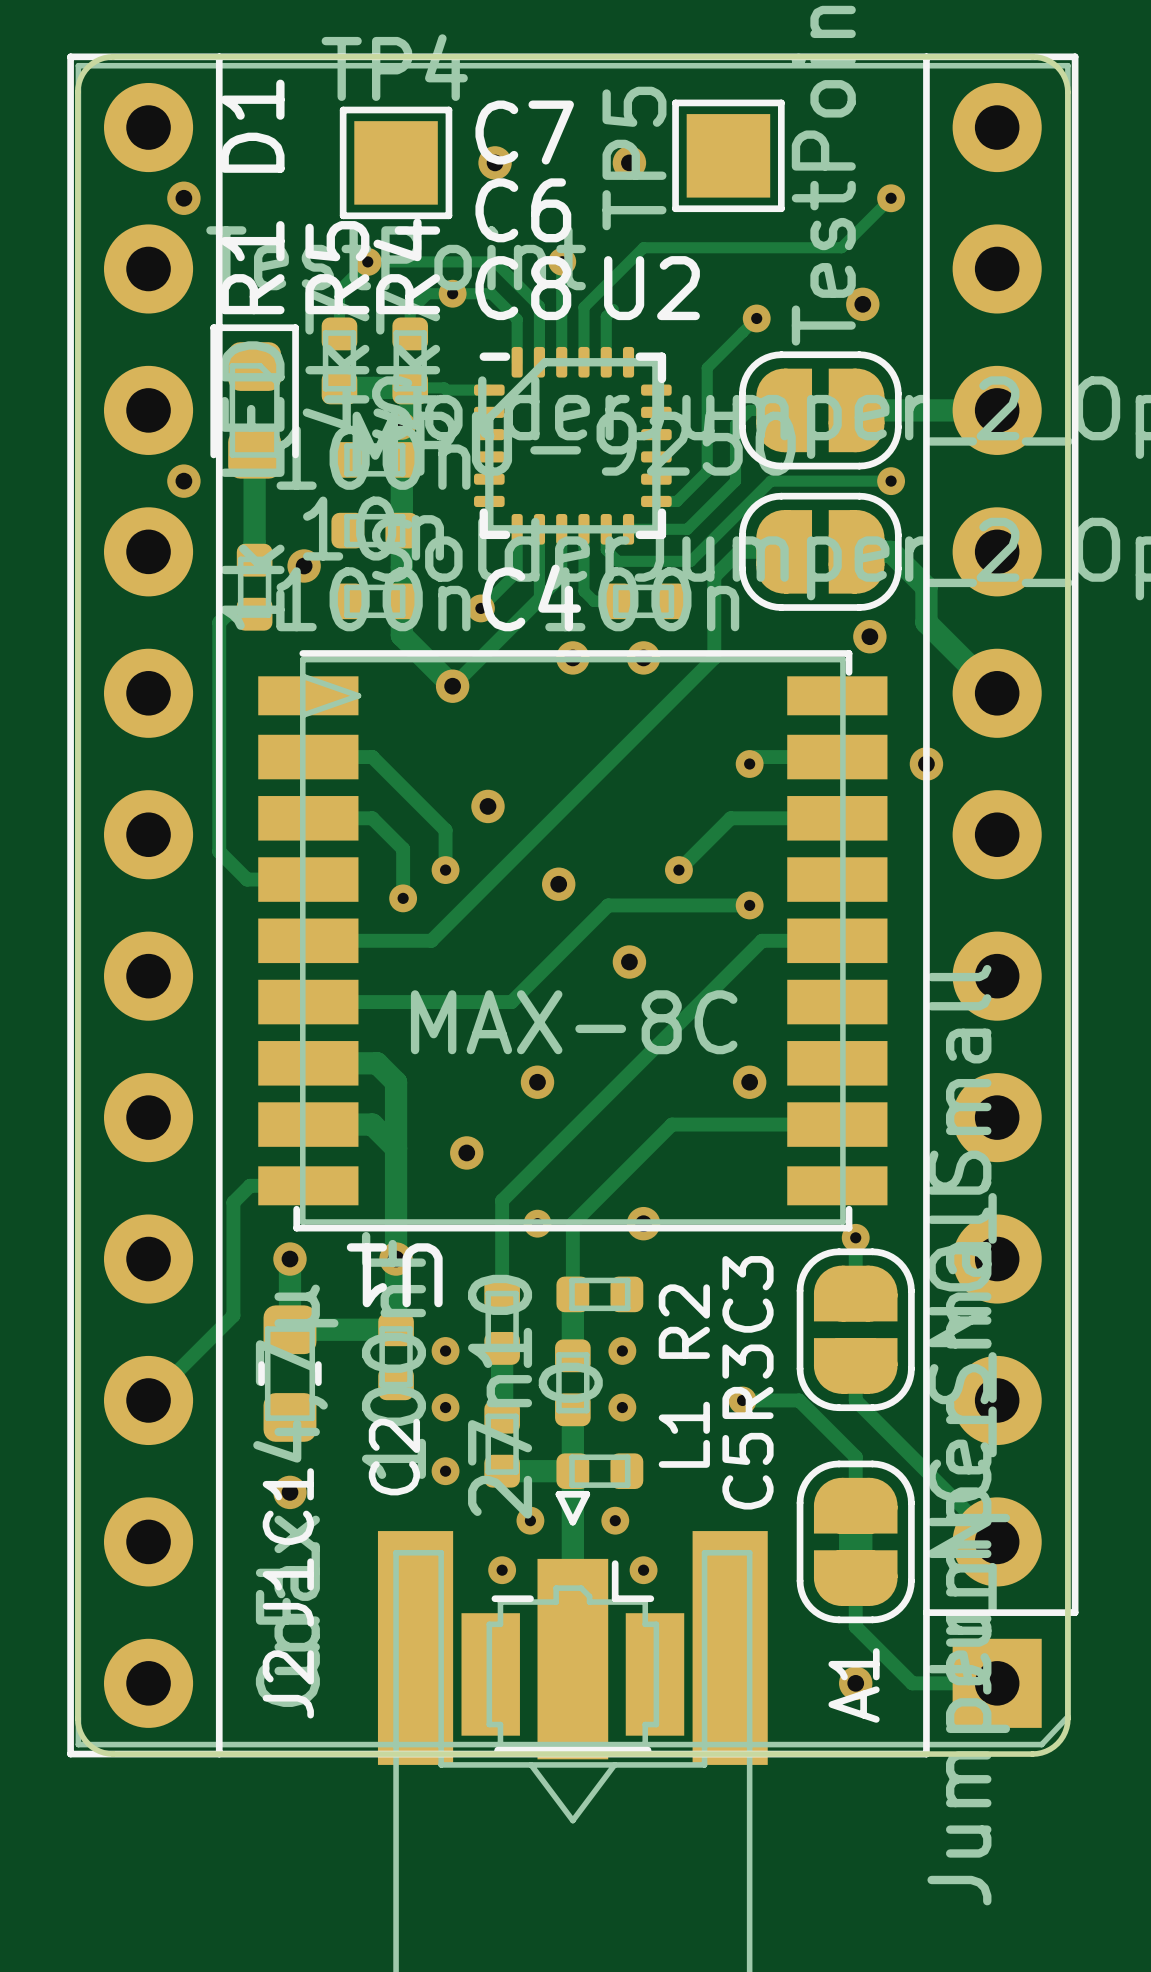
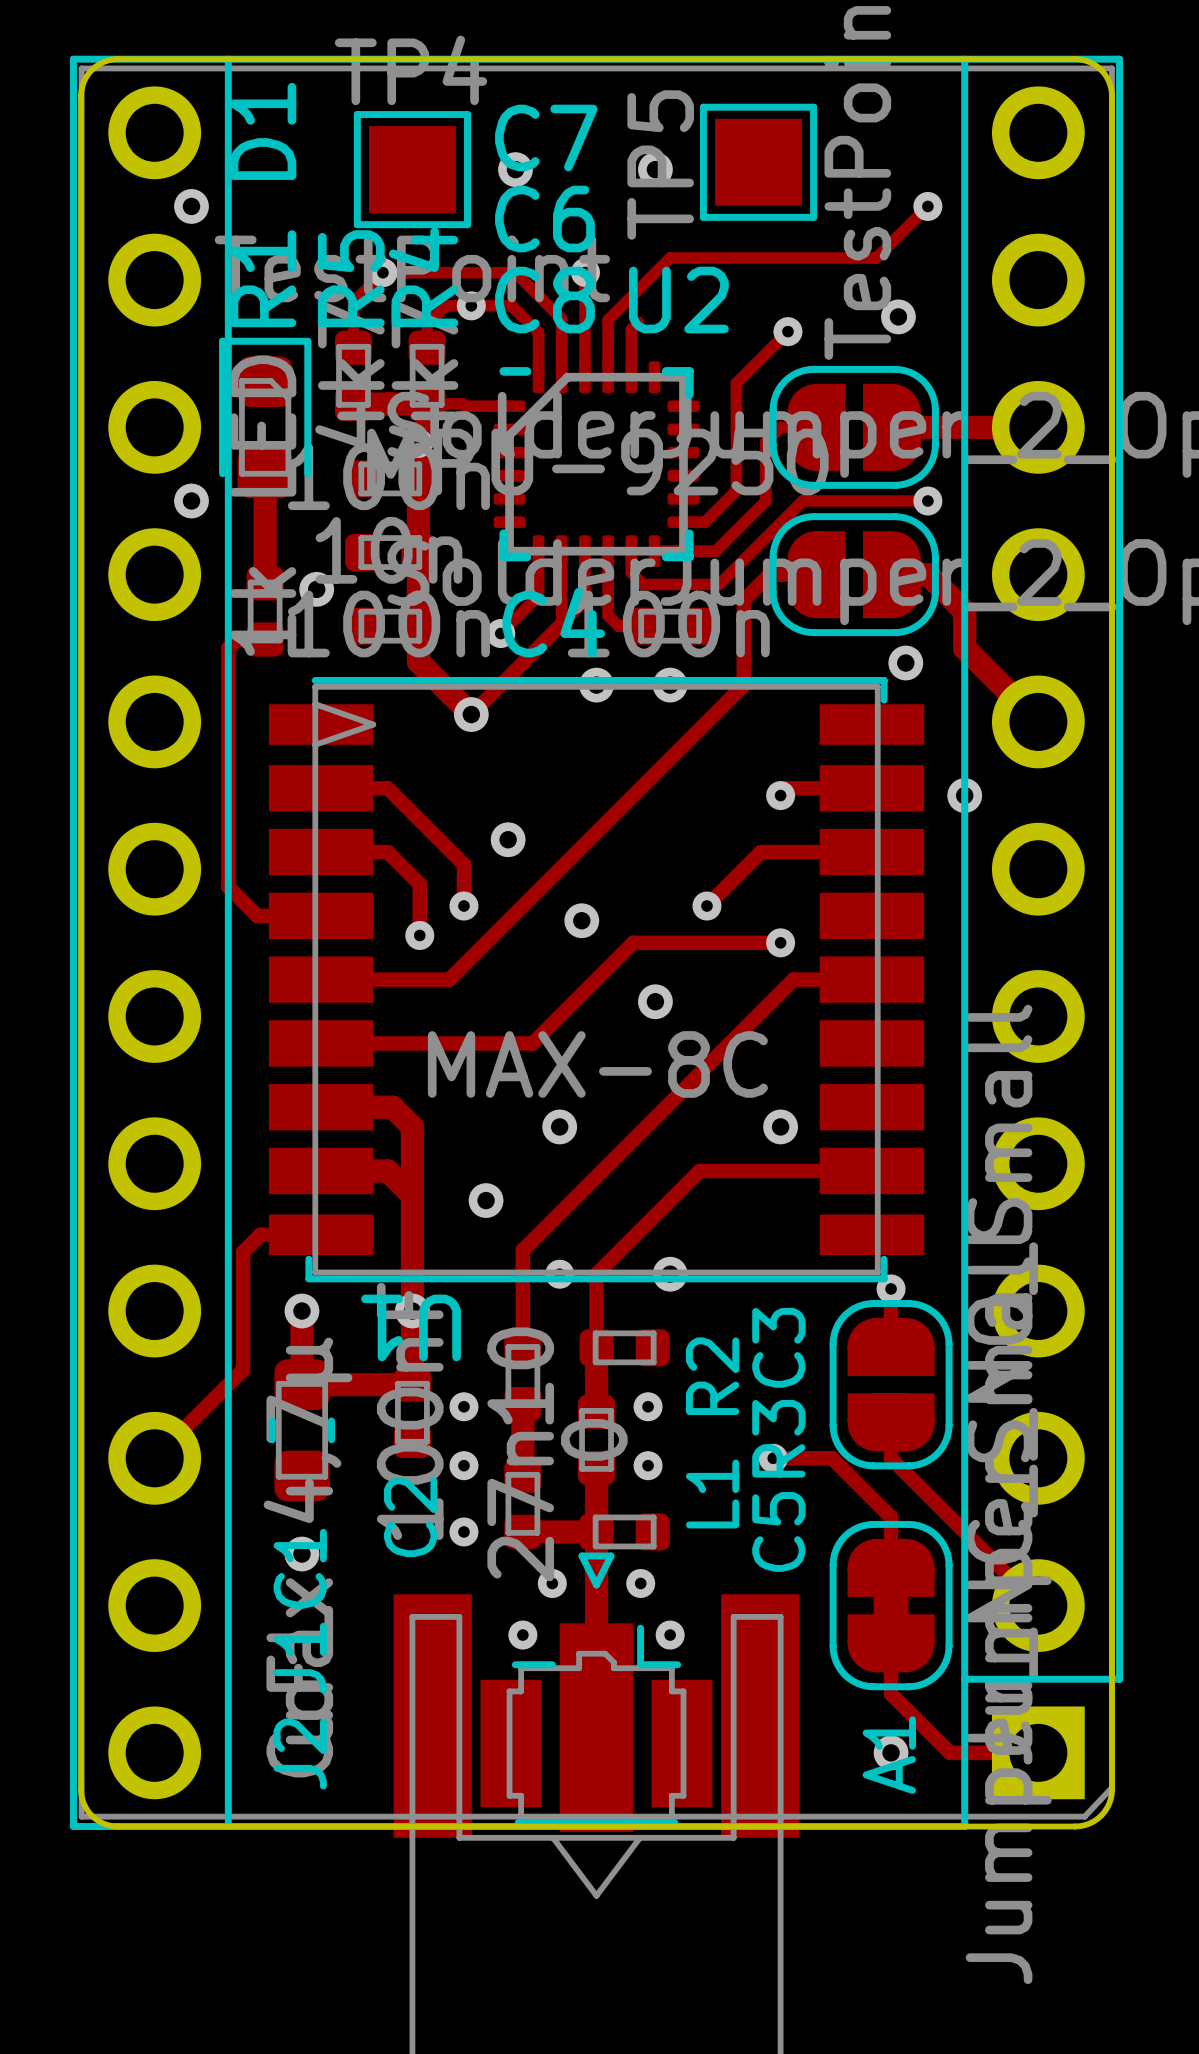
A1 footprint: [67, 53, 1079, 1758] -> [70, 55, 1124, 1830]

